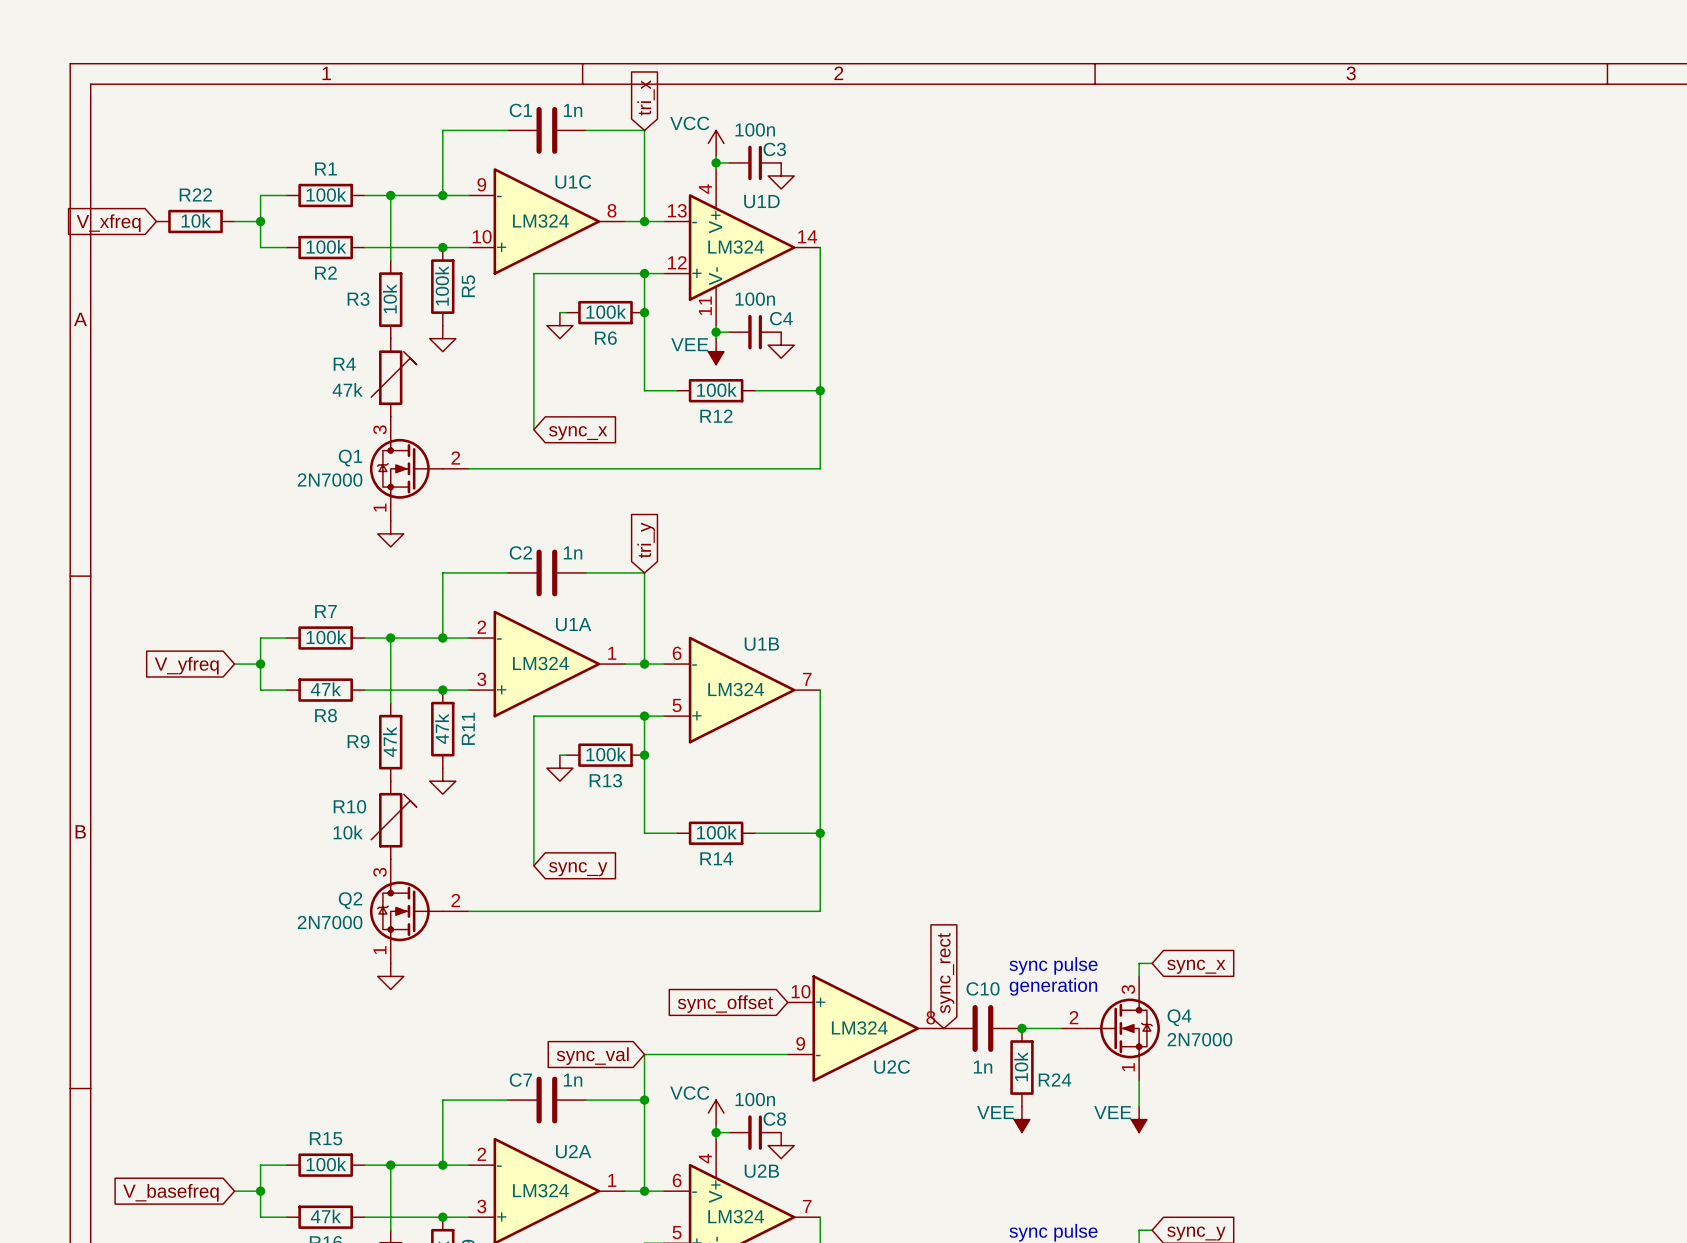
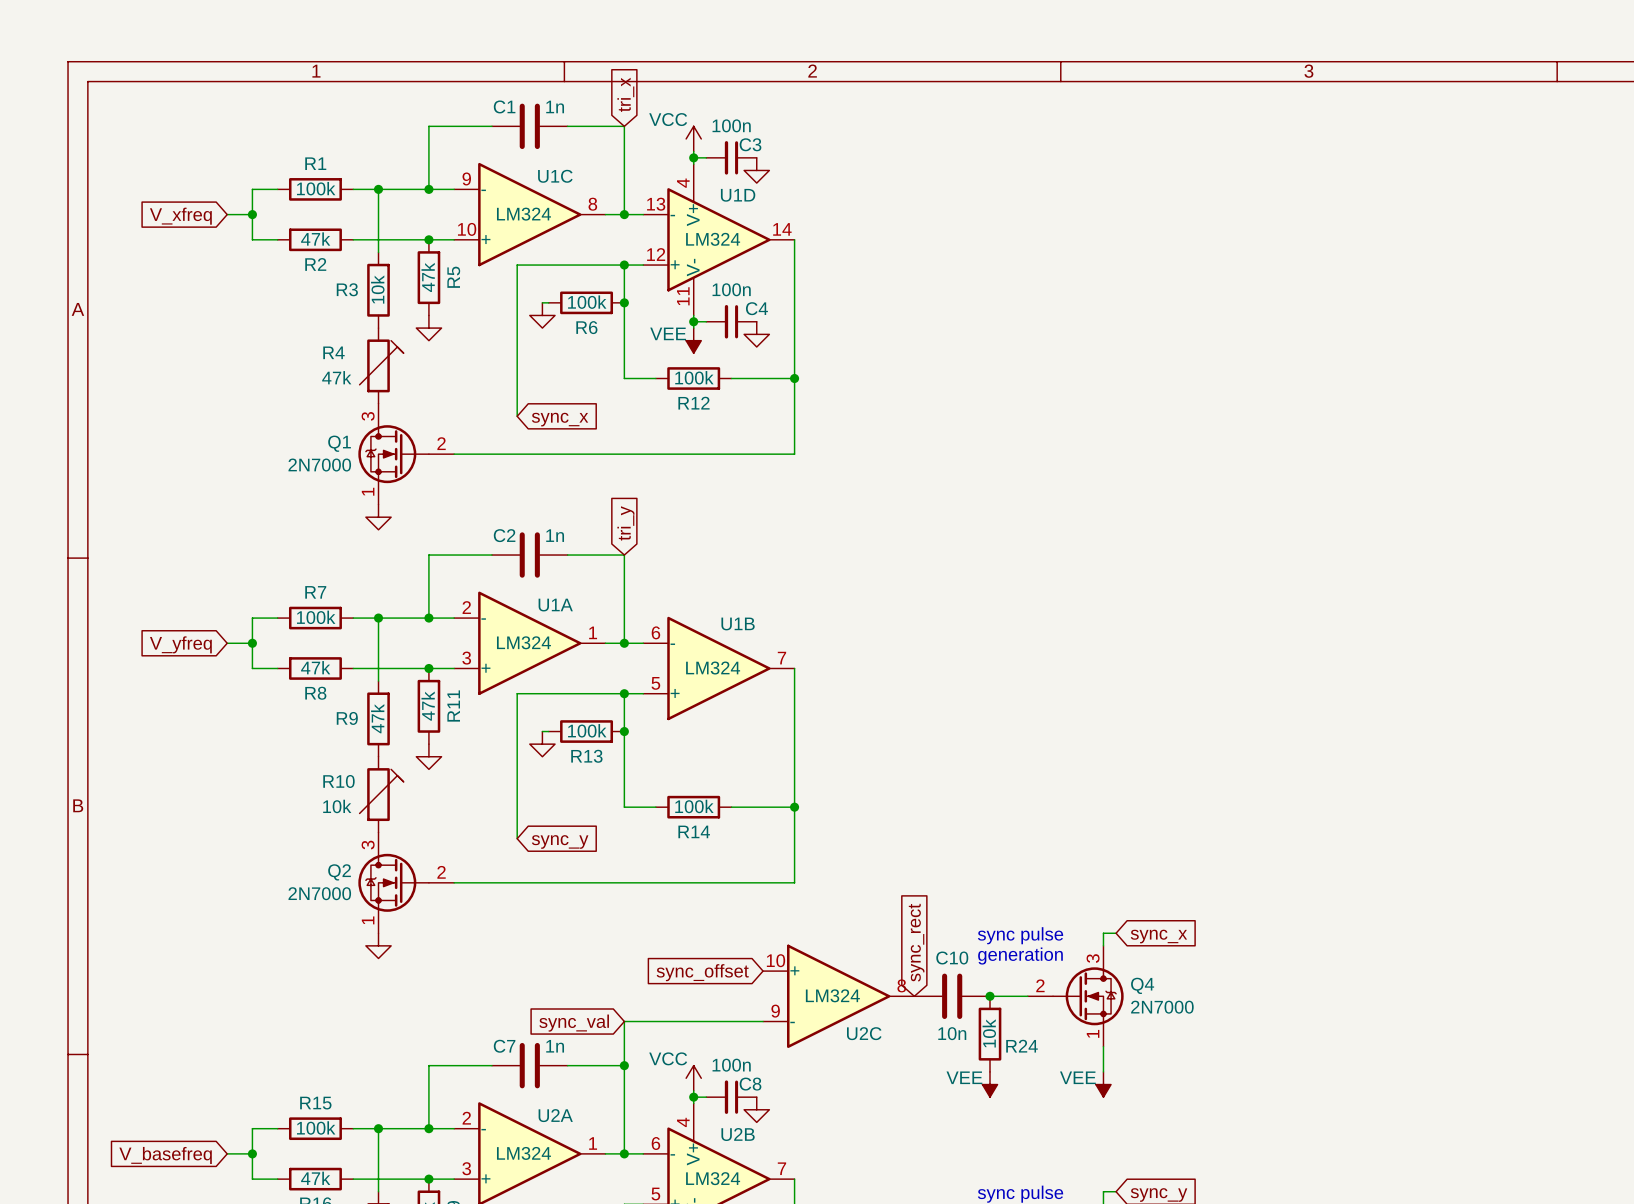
R22: 10k (195, 221) -> none
global label position: V_xfreq (108, 223) -> V_xfreq (180, 216)
R2 value: 100k (326, 246) -> 47k (315, 239)
R5 value: 100k (442, 285) -> 47k (428, 277)
C10 value: 1n (983, 1067) -> 10n (952, 1033)

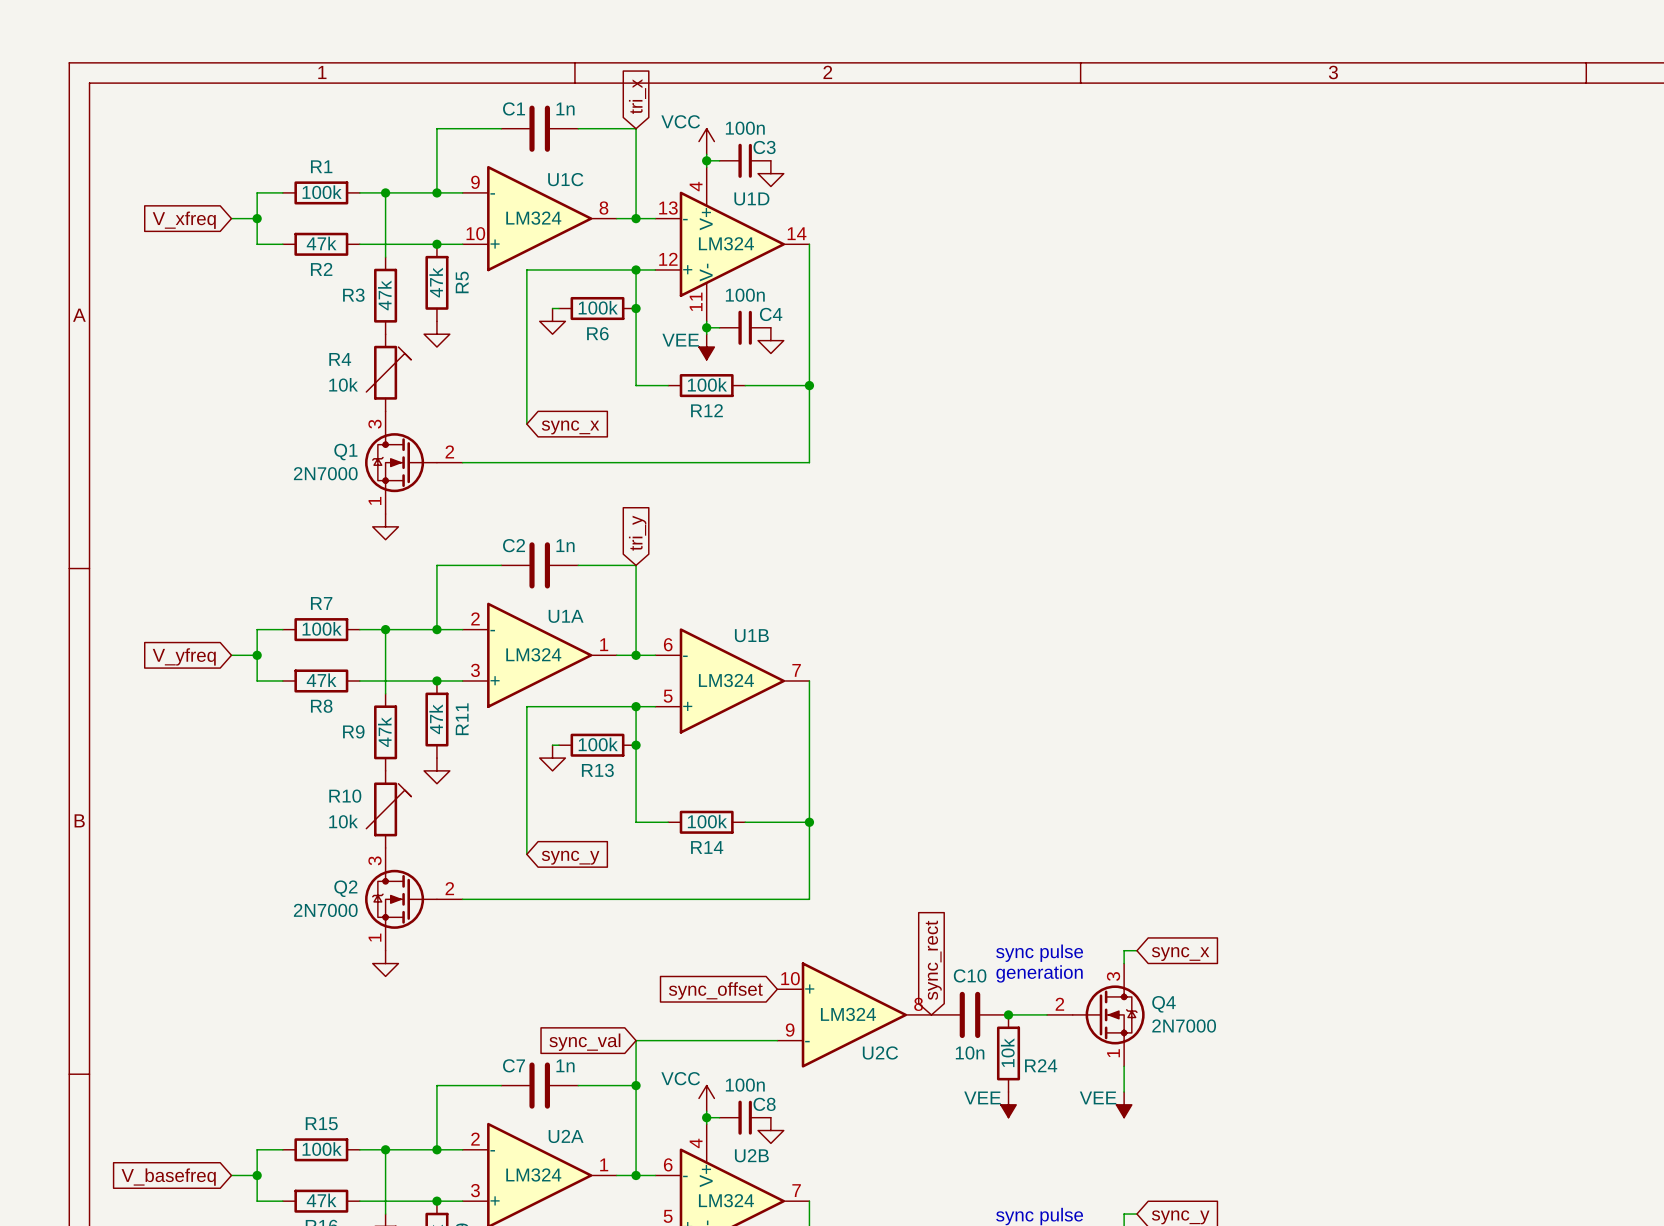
R3 value: 10k (377, 289) -> 47k (384, 295)
R4 value: 47k (336, 377) -> 10k (343, 384)

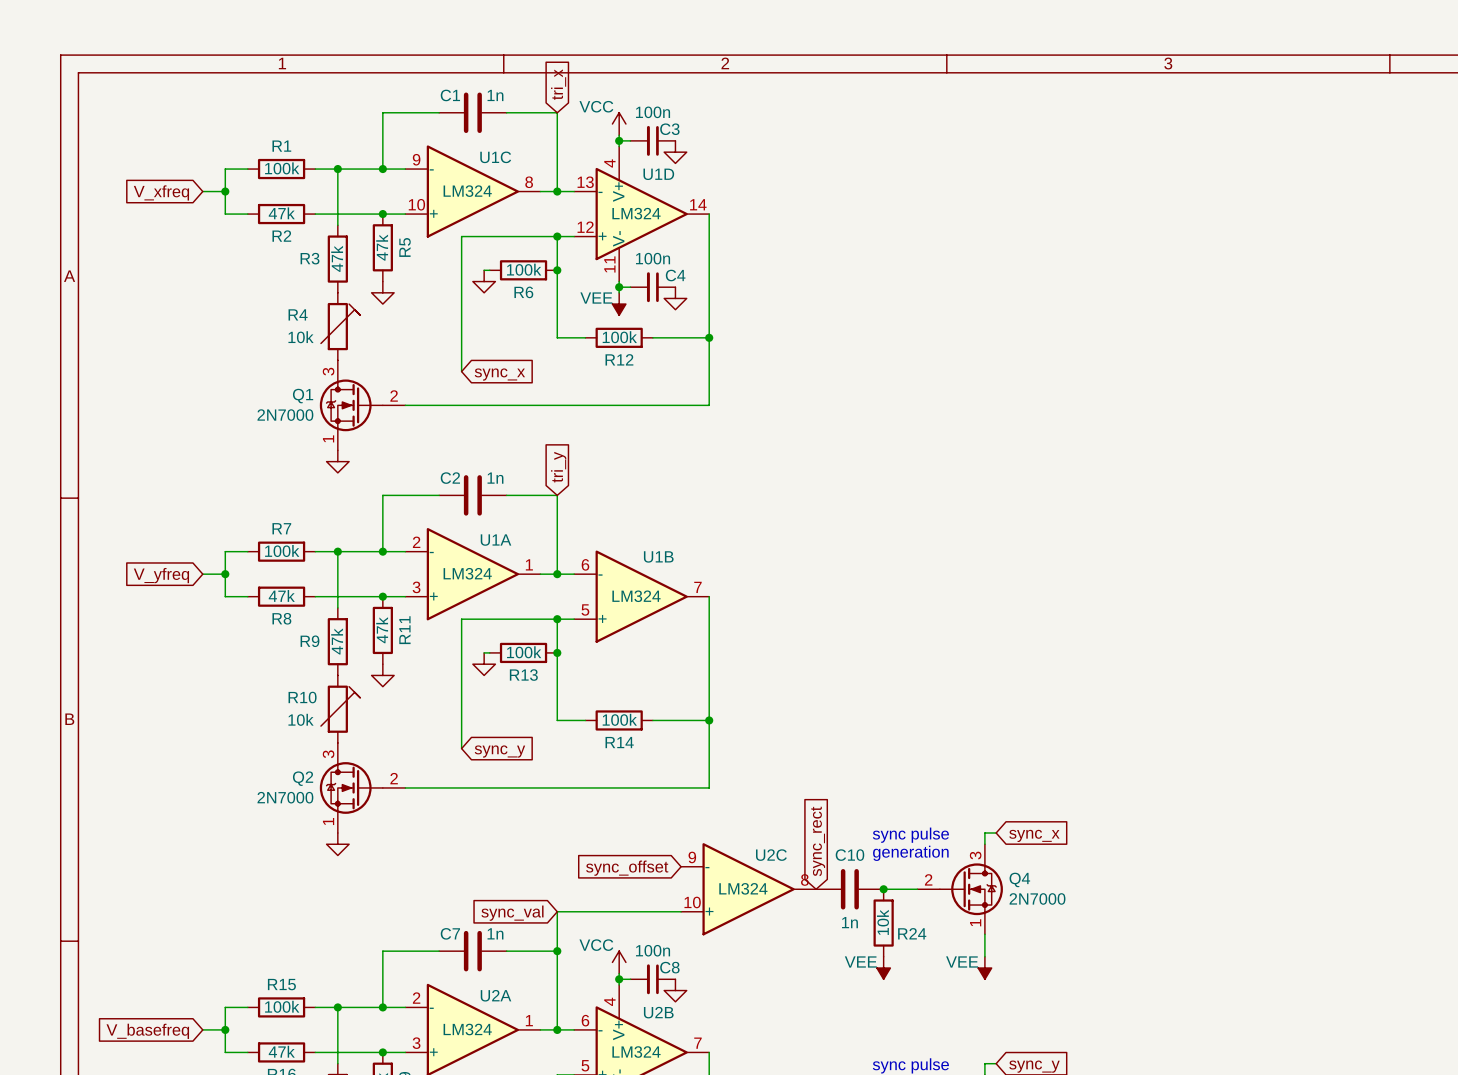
U2C flip: as is (854, 1014) -> up-down (748, 889)
C10 value: 10n (970, 1052) -> 1n (849, 922)

